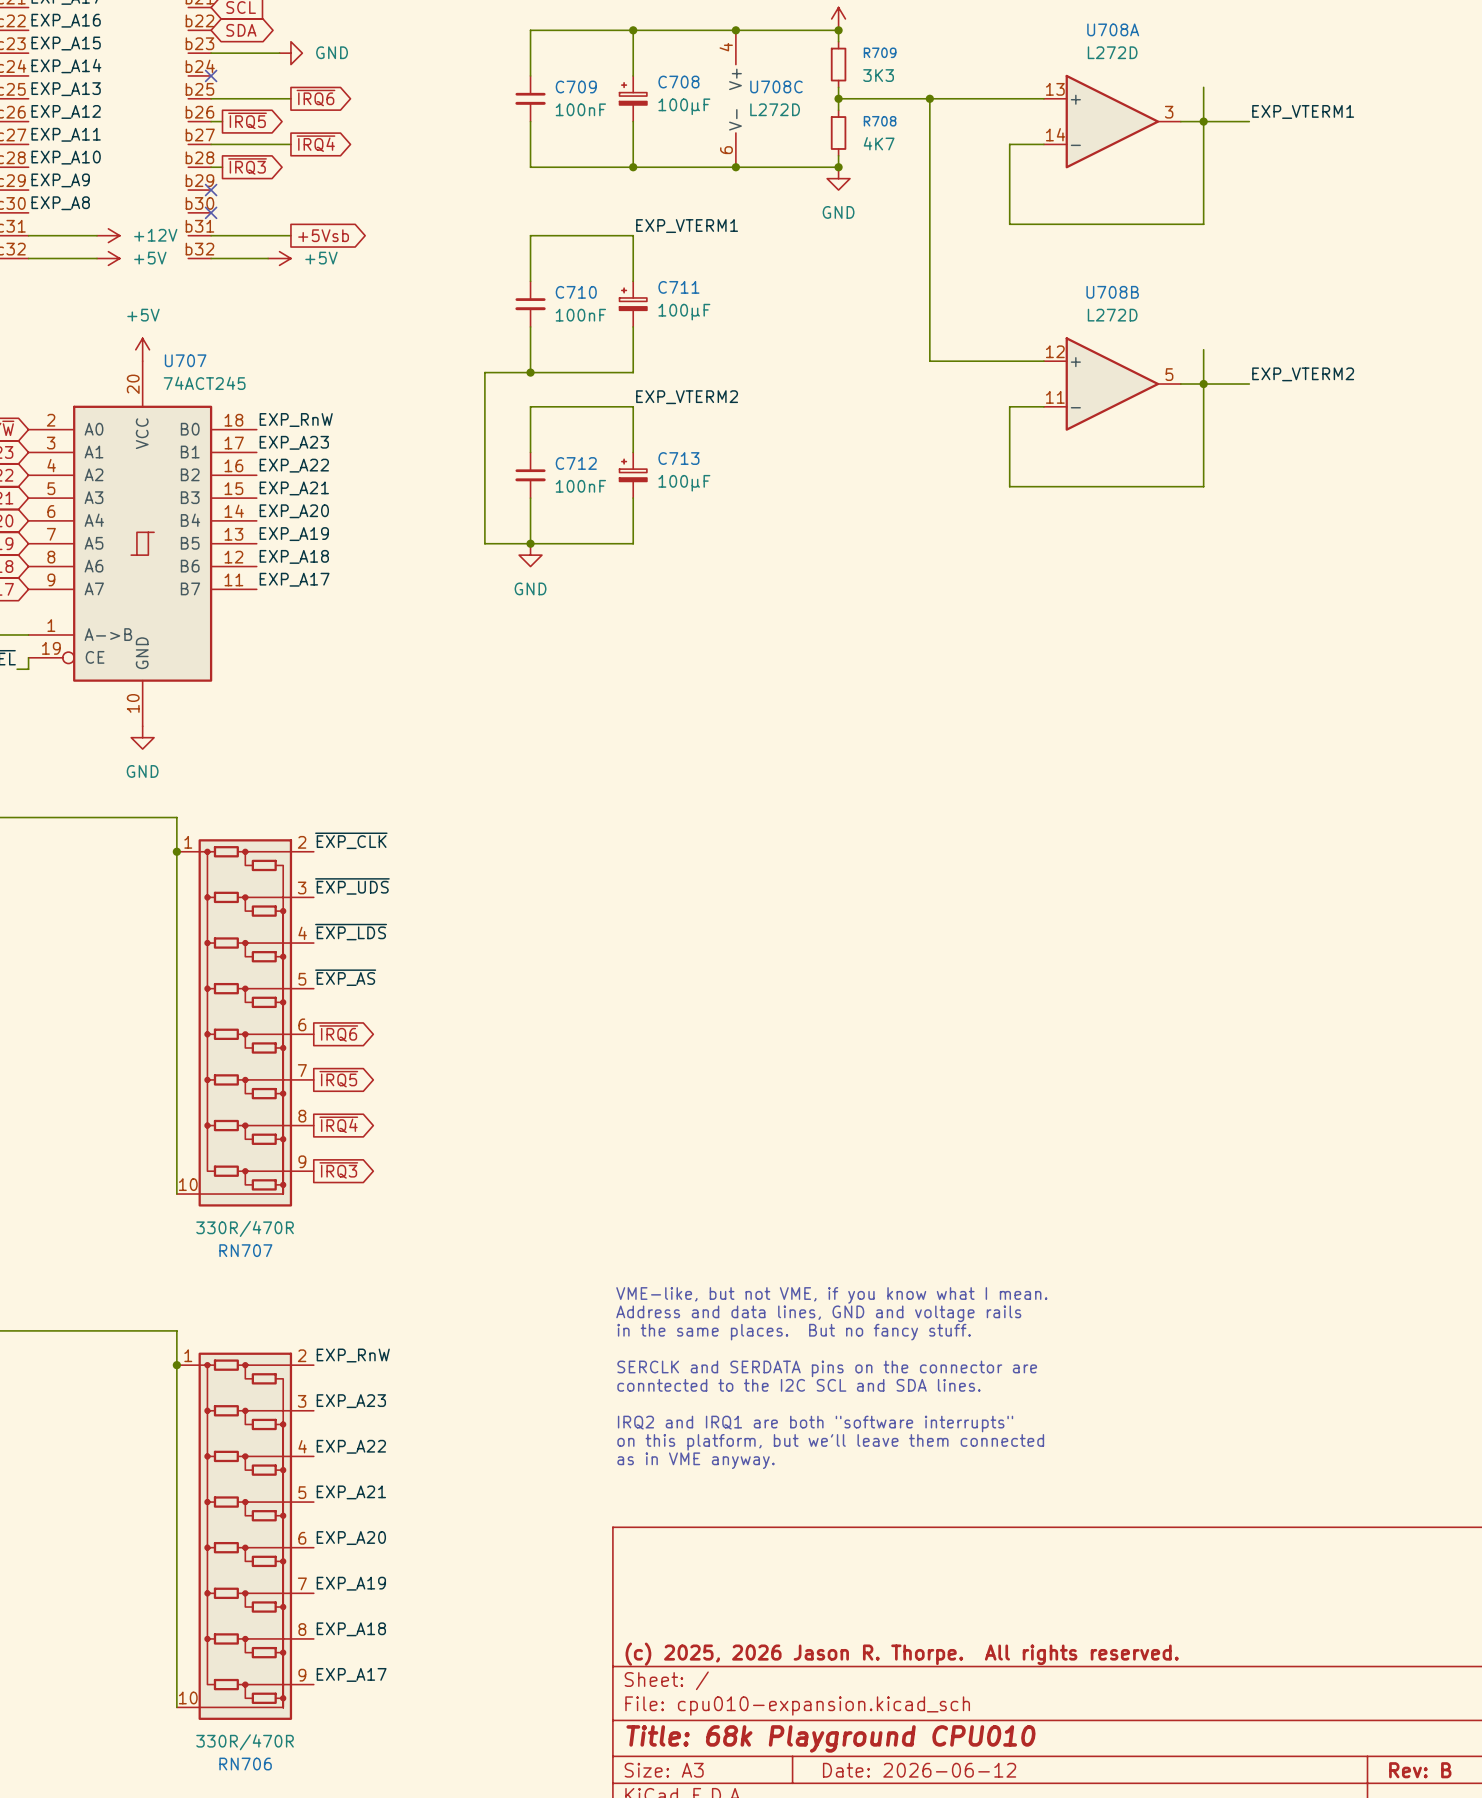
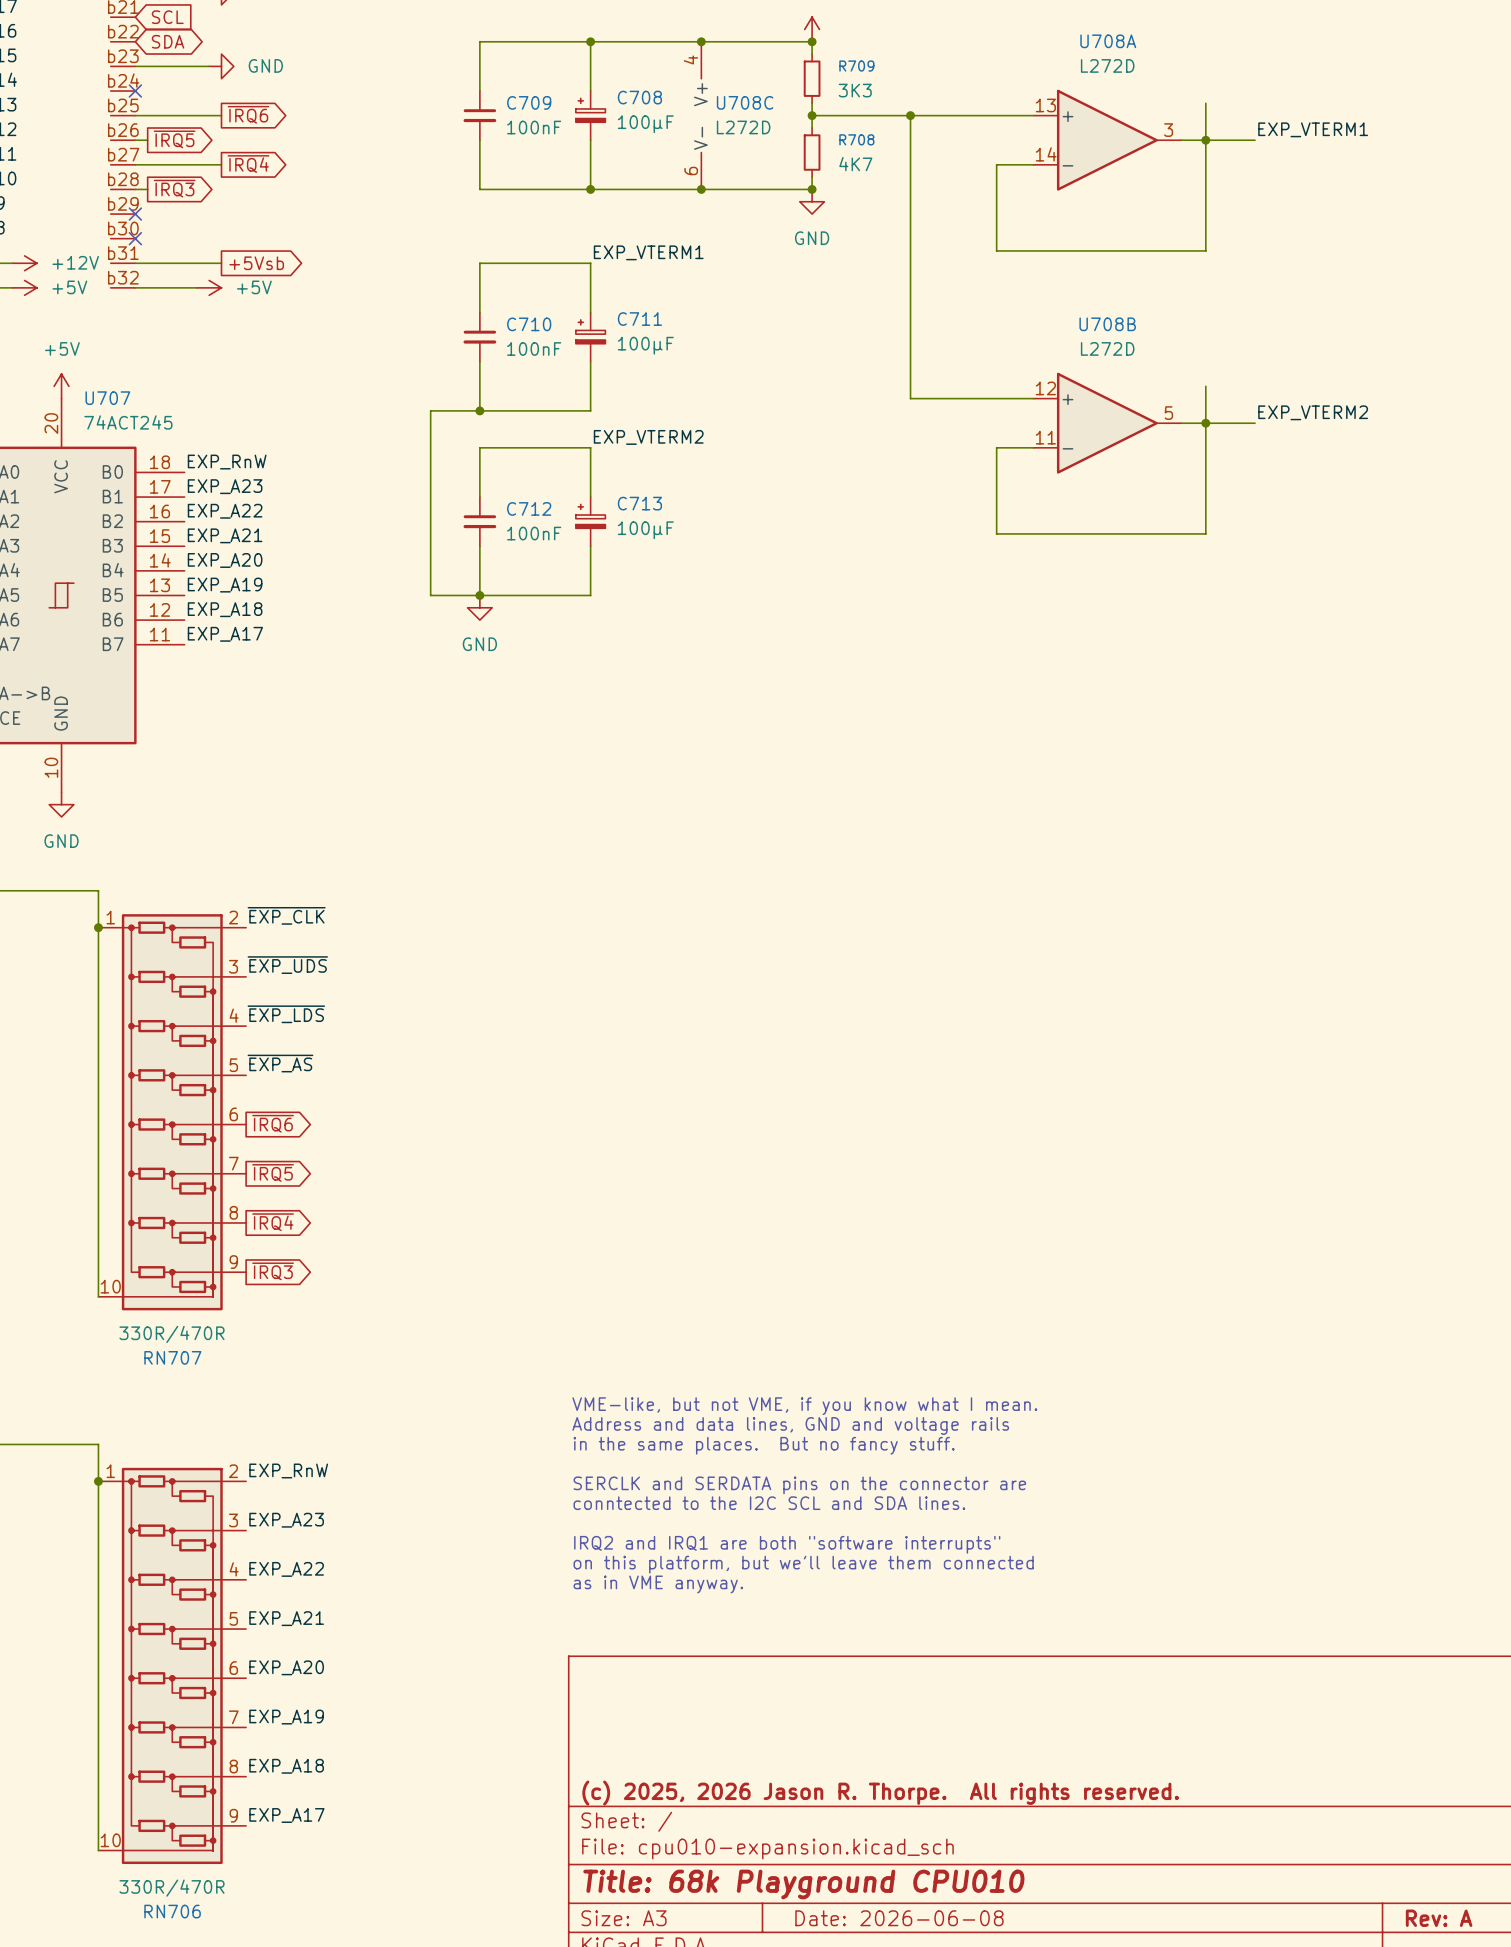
title block: Date: 2026-06-12 (919, 1770) -> Date: 2026-06-08 (899, 1918)
title block: Rev: B (1420, 1770) -> Rev: A (1439, 1918)

